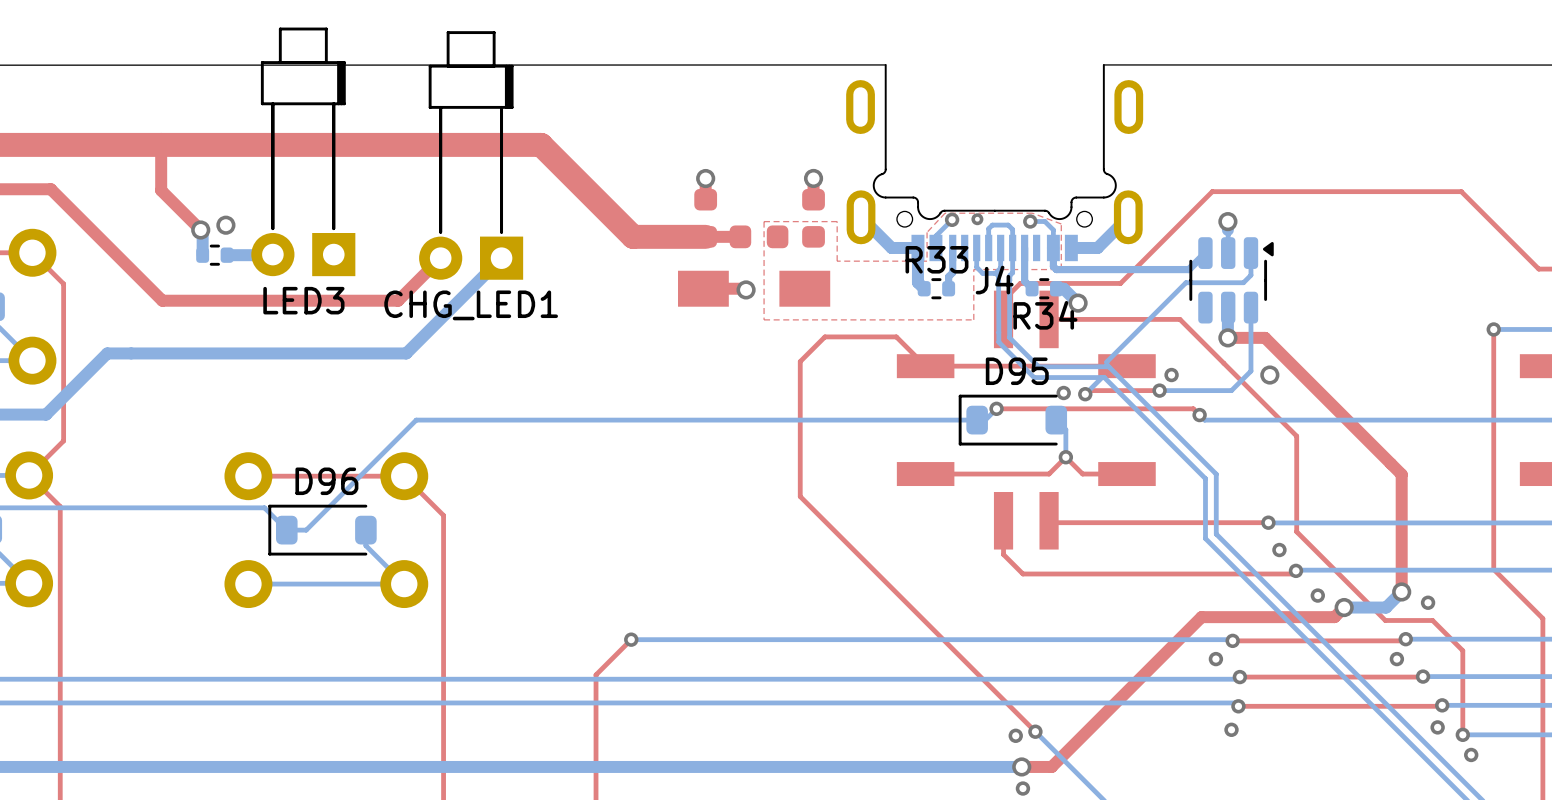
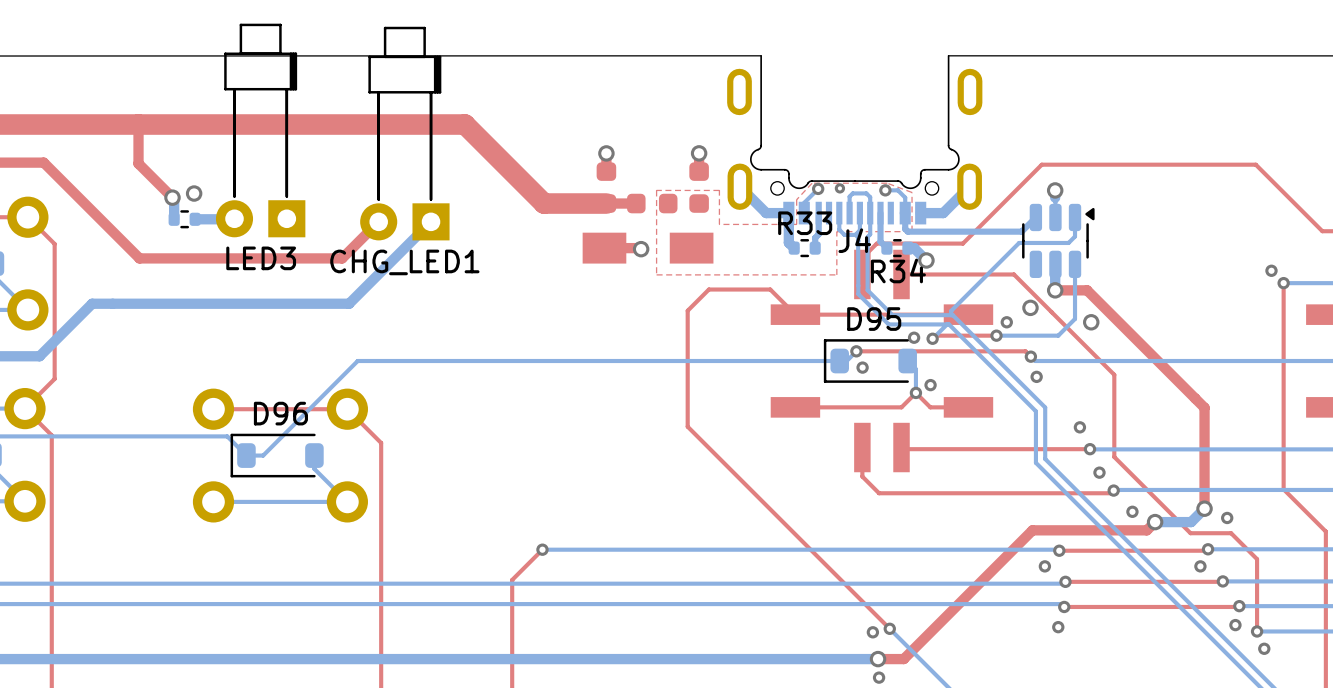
via: none -> (1271, 270)
via: none -> (1030, 307)
via: none -> (862, 367)
via: none -> (1036, 376)
via: none -> (930, 385)
via: none -> (1079, 427)

